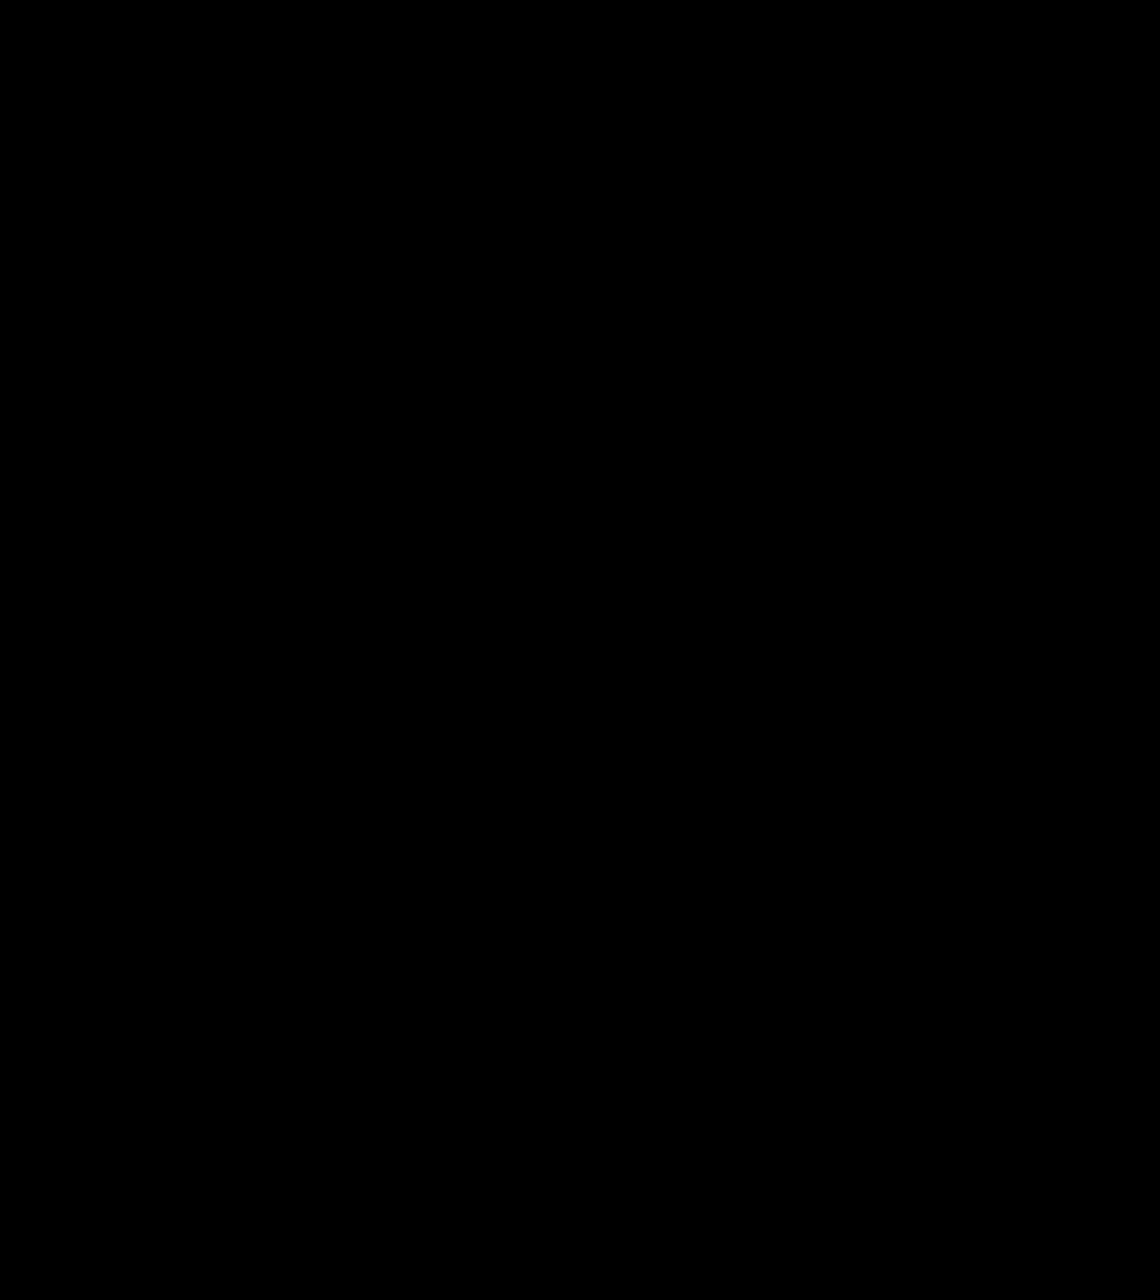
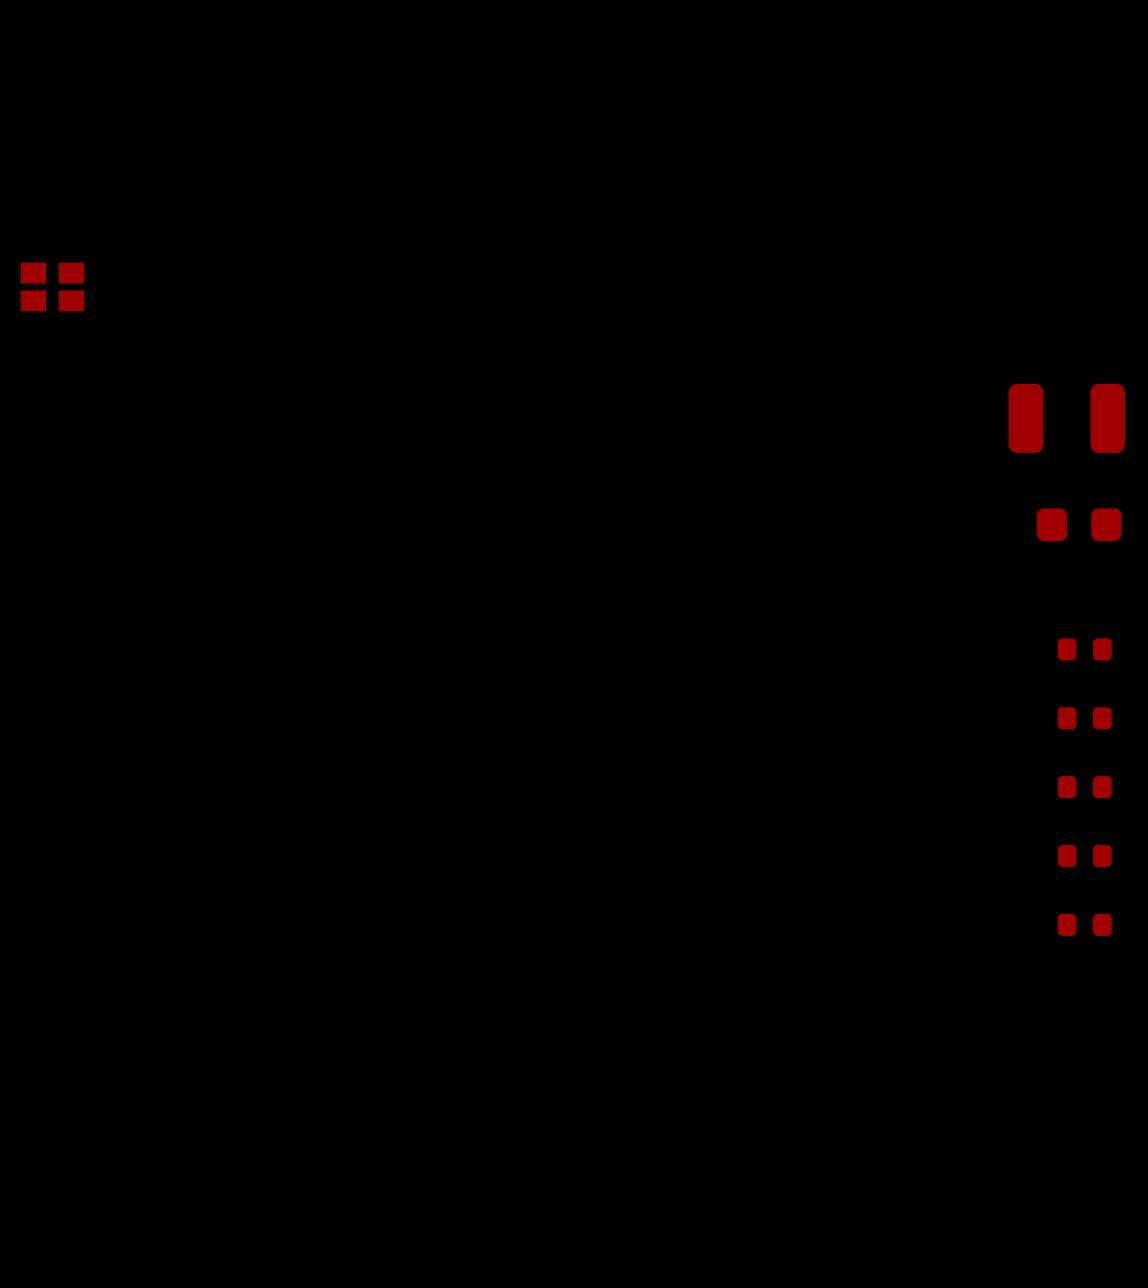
part: none -> (52, 286)
part: none -> (1026, 418)
part: none -> (1107, 418)
part: none -> (1079, 524)
part: none -> (1084, 649)
part: none -> (1084, 718)
part: none -> (1084, 787)
part: none -> (1084, 856)
part: none -> (1084, 924)

